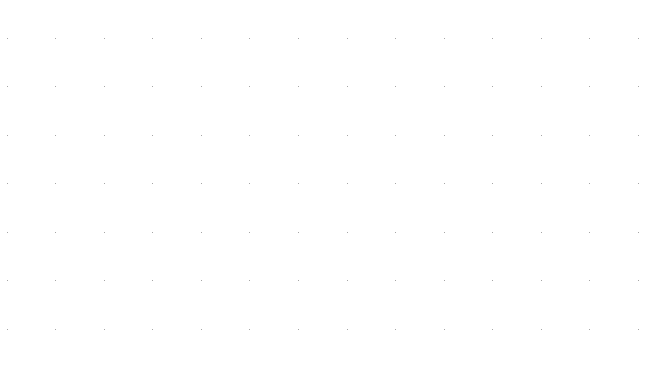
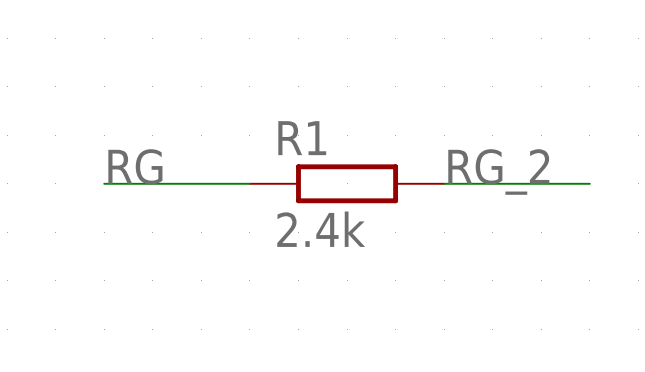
label: none -> RG (135, 166)
label: none -> RG_2 (498, 171)
wire: none -> (104, 183) (249, 183)
R1: none -> 2.4k (347, 183)
wire: none -> (444, 183) (589, 183)

